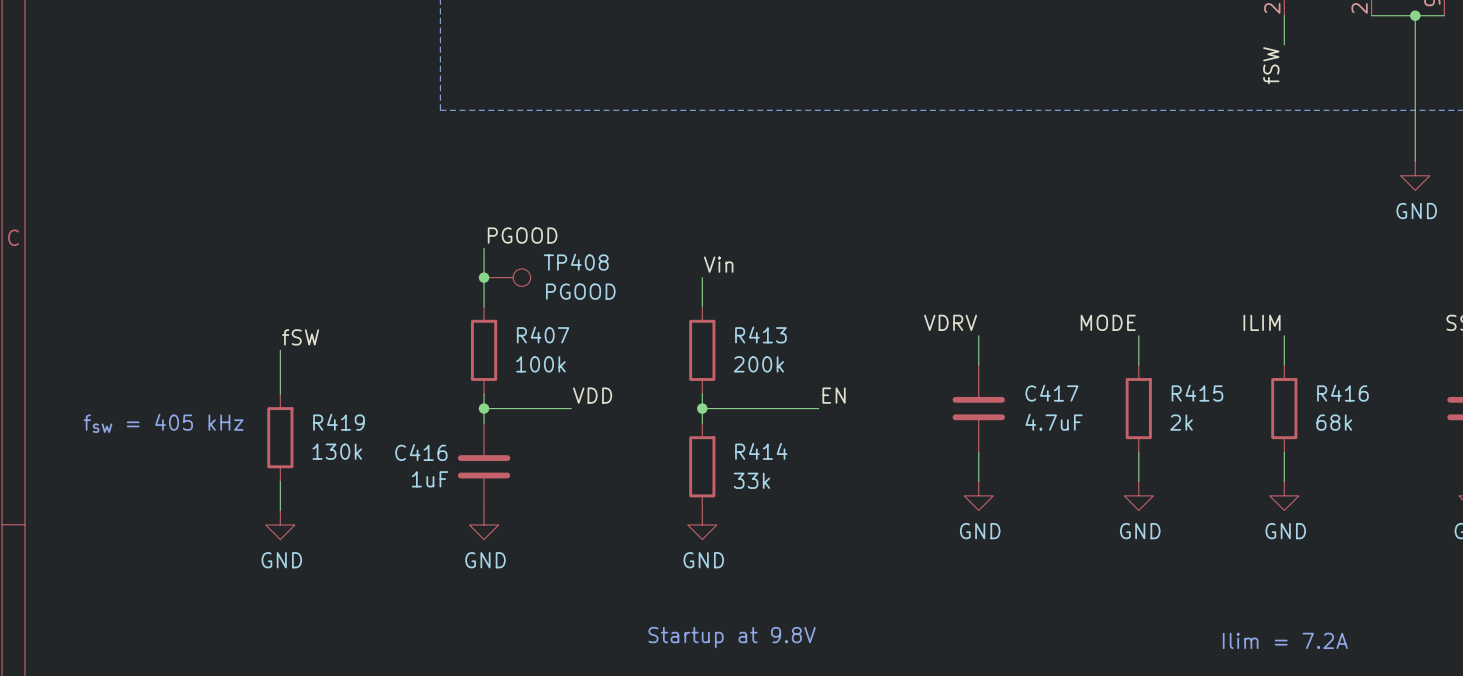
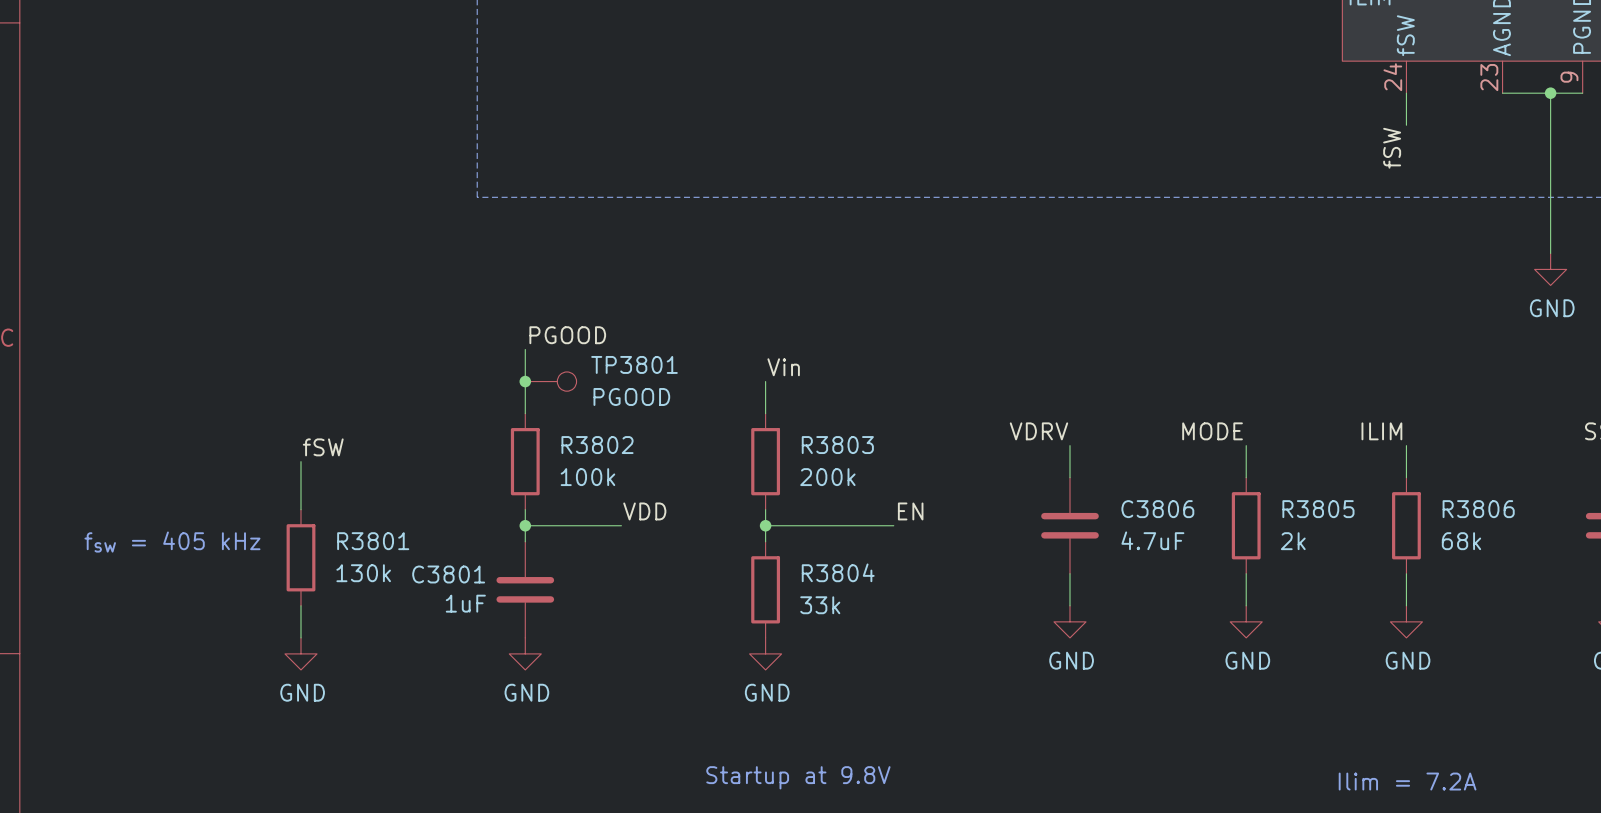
TP408 name: TP408 (576, 262) -> TP3801 (634, 364)
R407 name: R407 (543, 334) -> R3802 (597, 445)
R413 name: R413 (760, 334) -> R3803 (837, 445)
C417 name: C417 (1051, 393) -> C3806 (1157, 509)
R415 name: R415 (1197, 393) -> R3805 (1318, 509)
R416 name: R416 (1342, 393) -> R3806 (1478, 509)
R419 name: R419 (339, 422) -> R3801 (373, 541)
R414 name: R414 (761, 451) -> R3804 (838, 572)
C416 name: C416 (421, 452) -> C3801 (448, 574)

